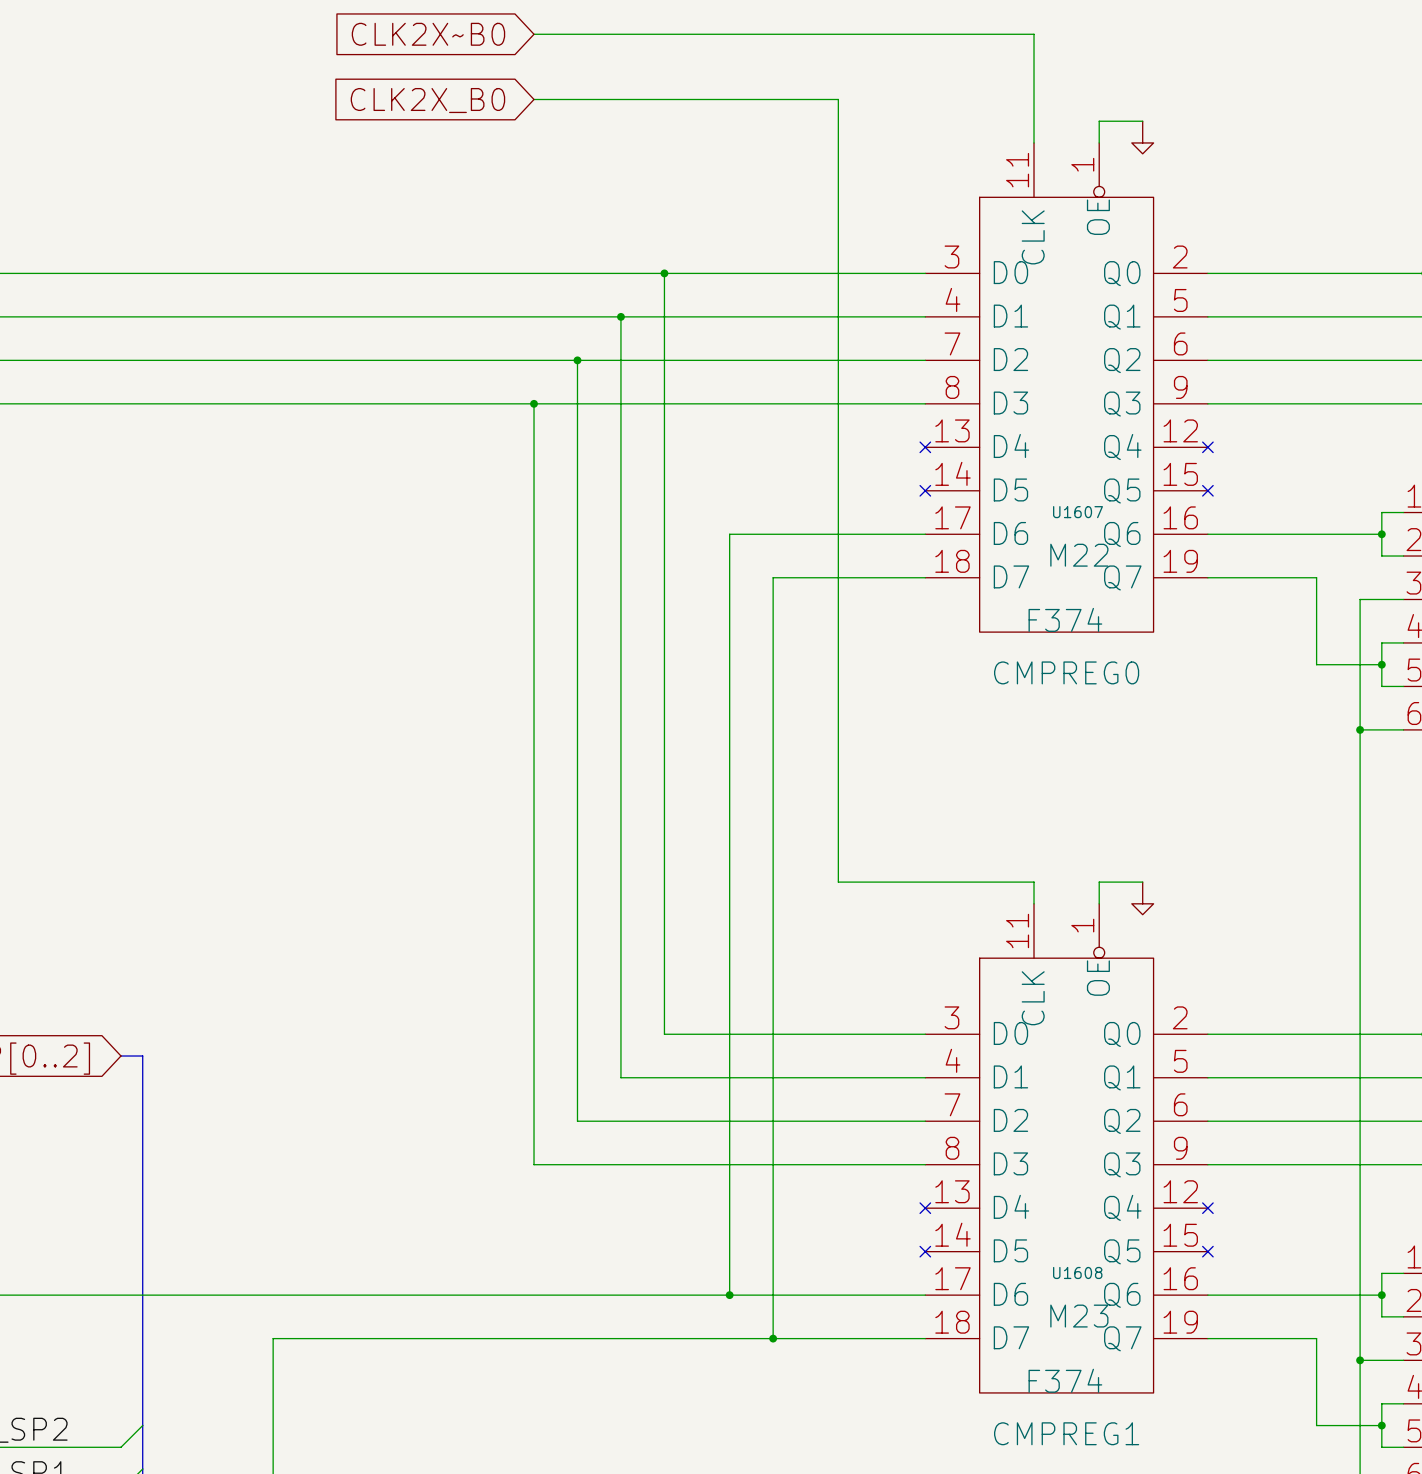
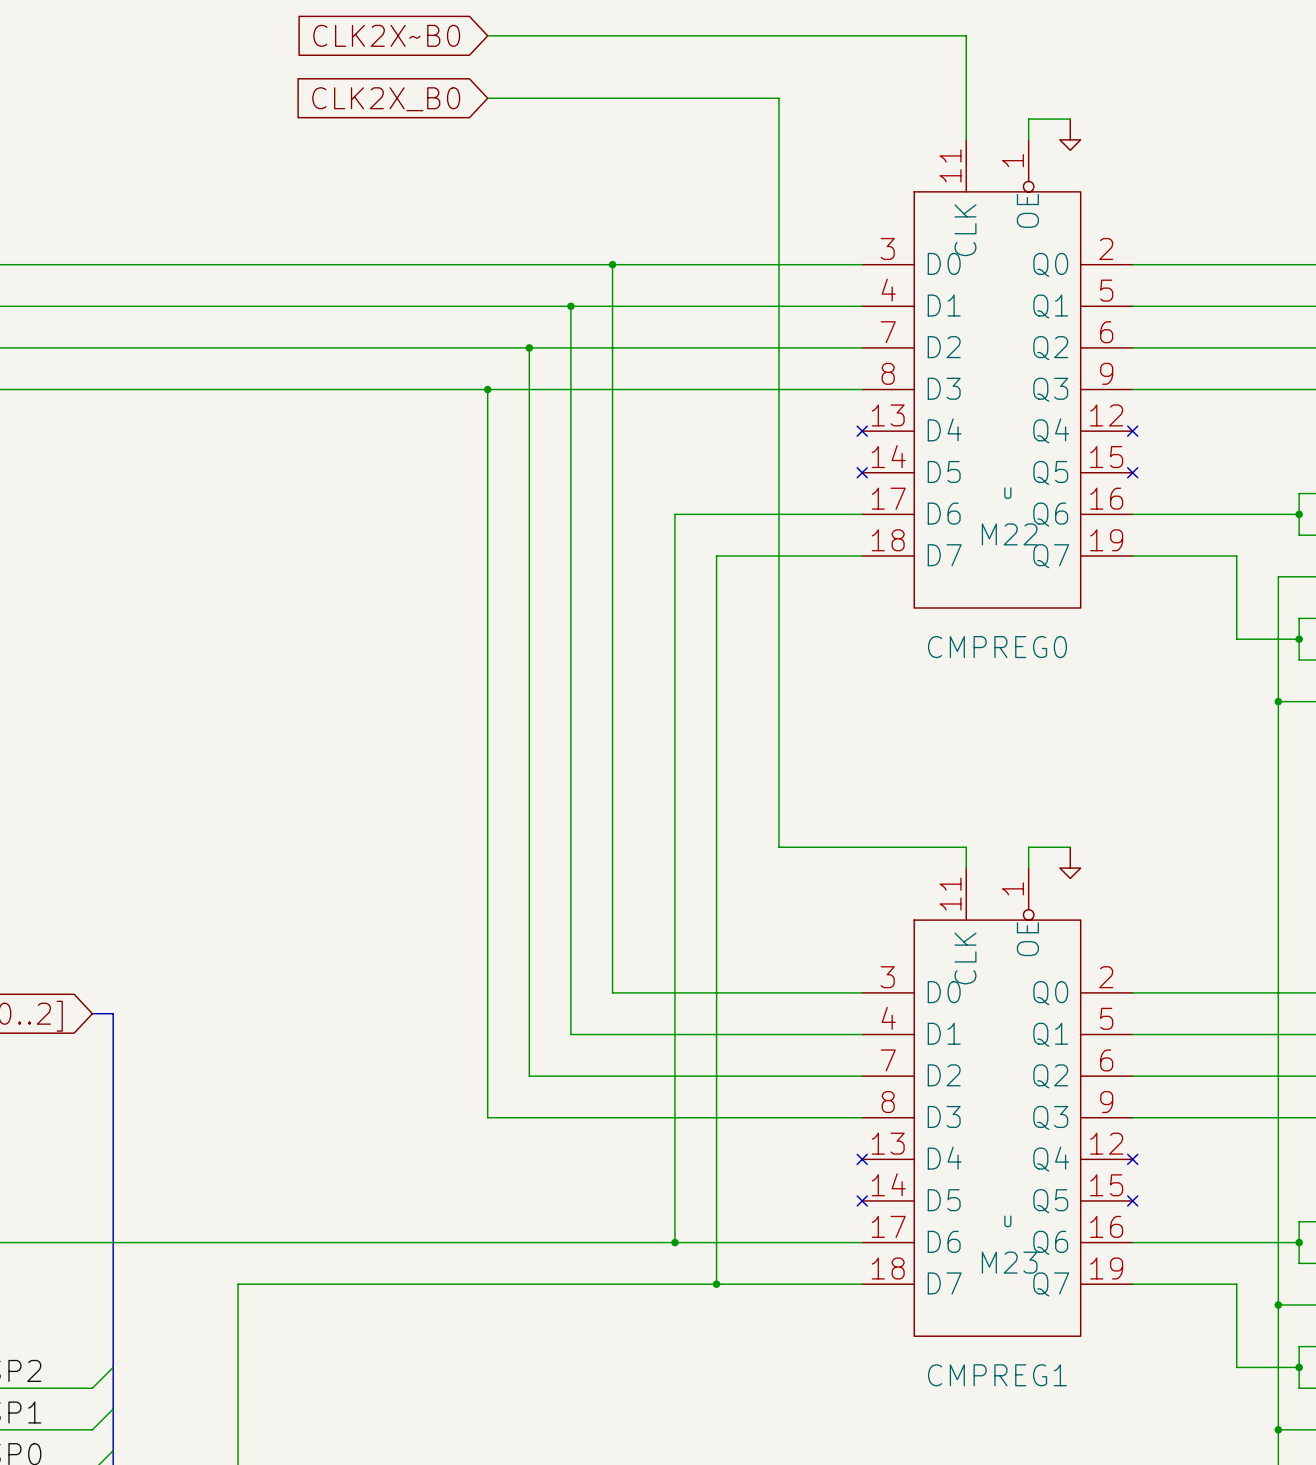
U1607 name: U1607 (1077, 512) -> U (1007, 493)
U1607 value: F374 (1065, 619) -> none
U1608 name: U1608 (1077, 1272) -> U (1007, 1221)
U1608 value: F374 (1065, 1380) -> none

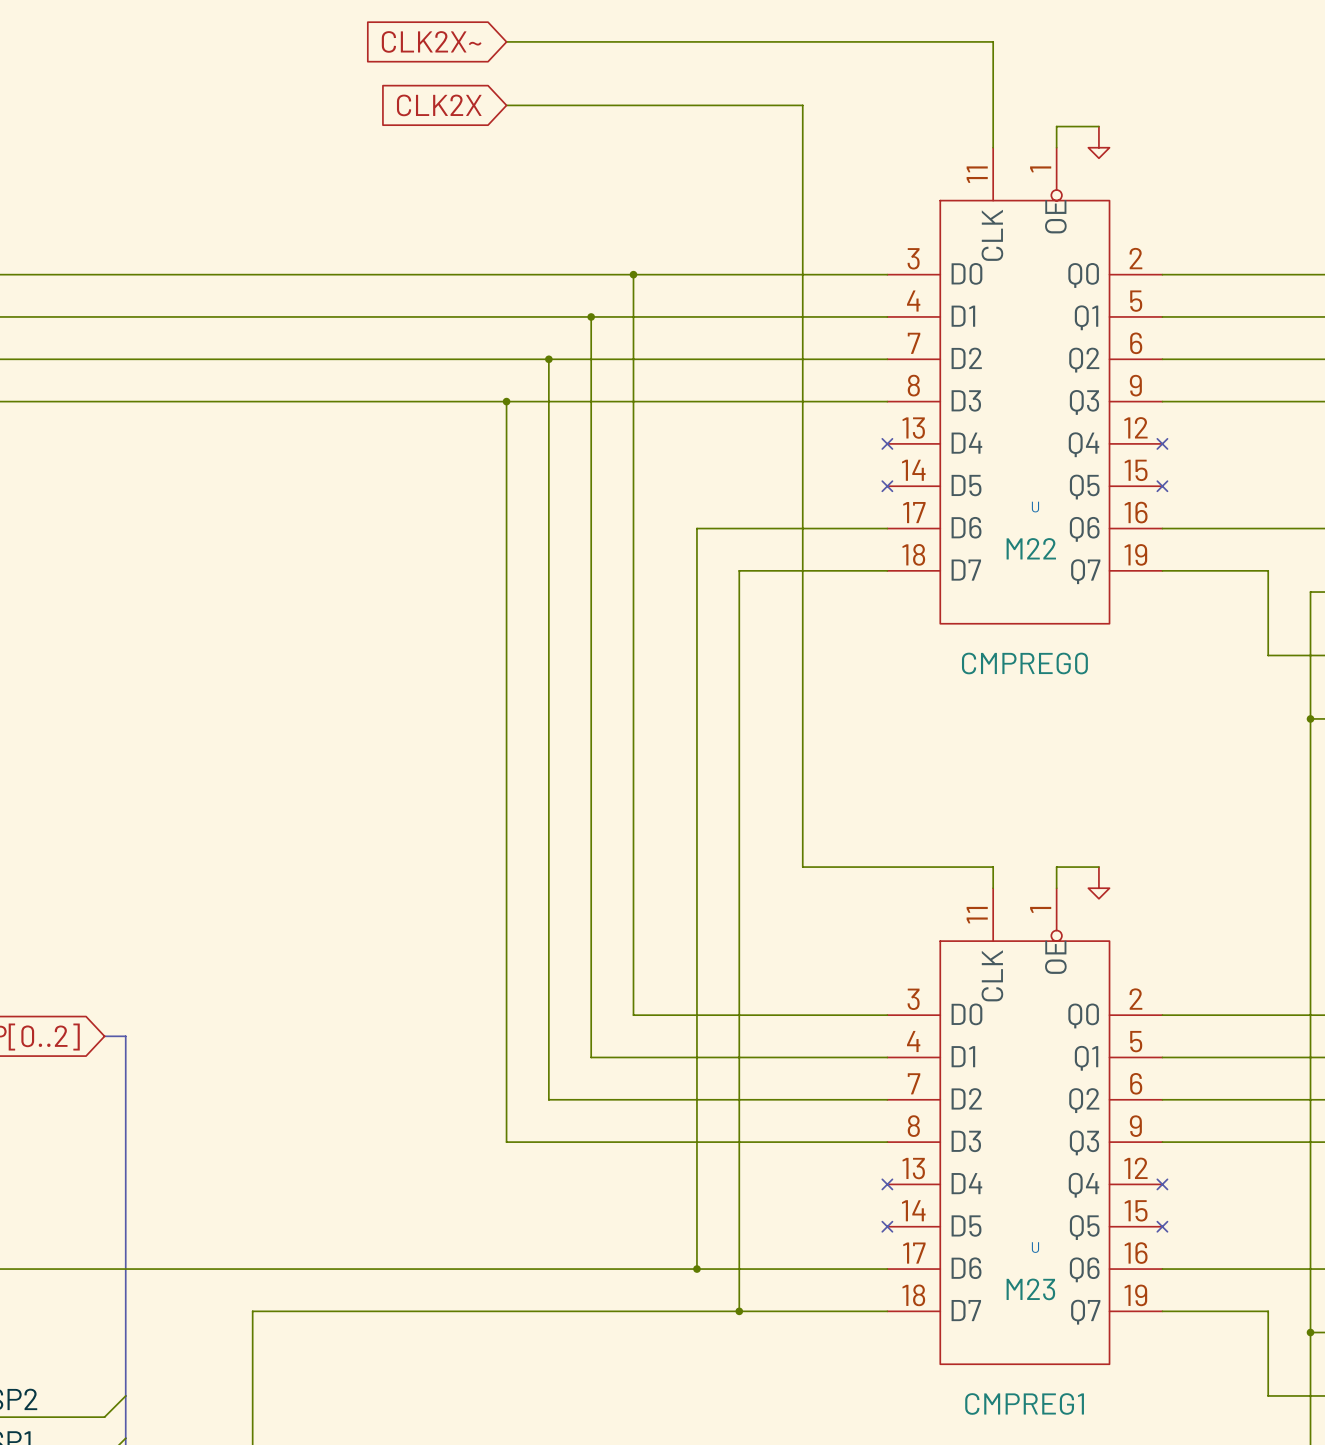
global label: CLK2X~B0 (386, 35) -> CLK2X~ (431, 41)
global label: CLK2X_B0 (386, 99) -> CLK2X (439, 105)

